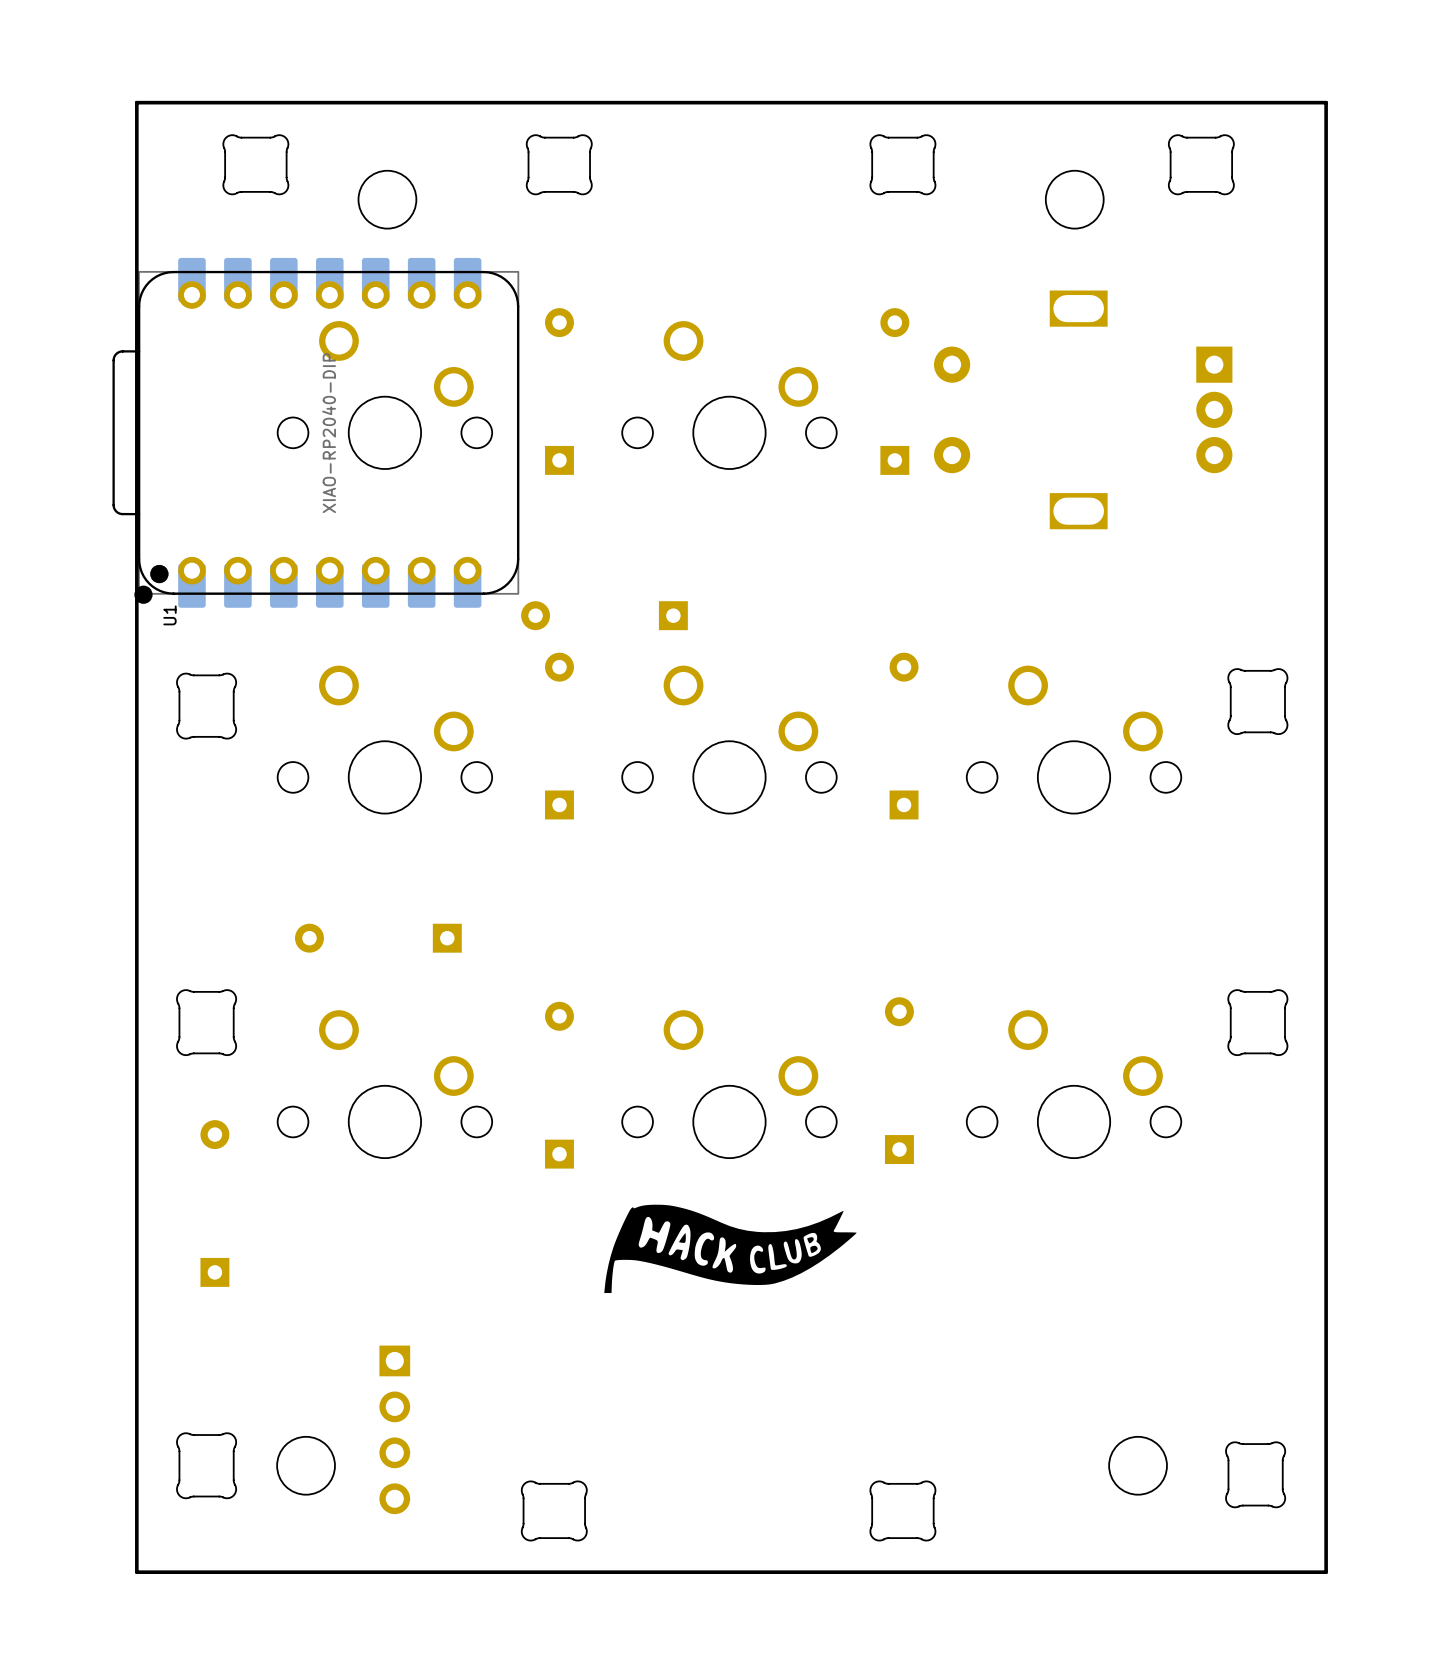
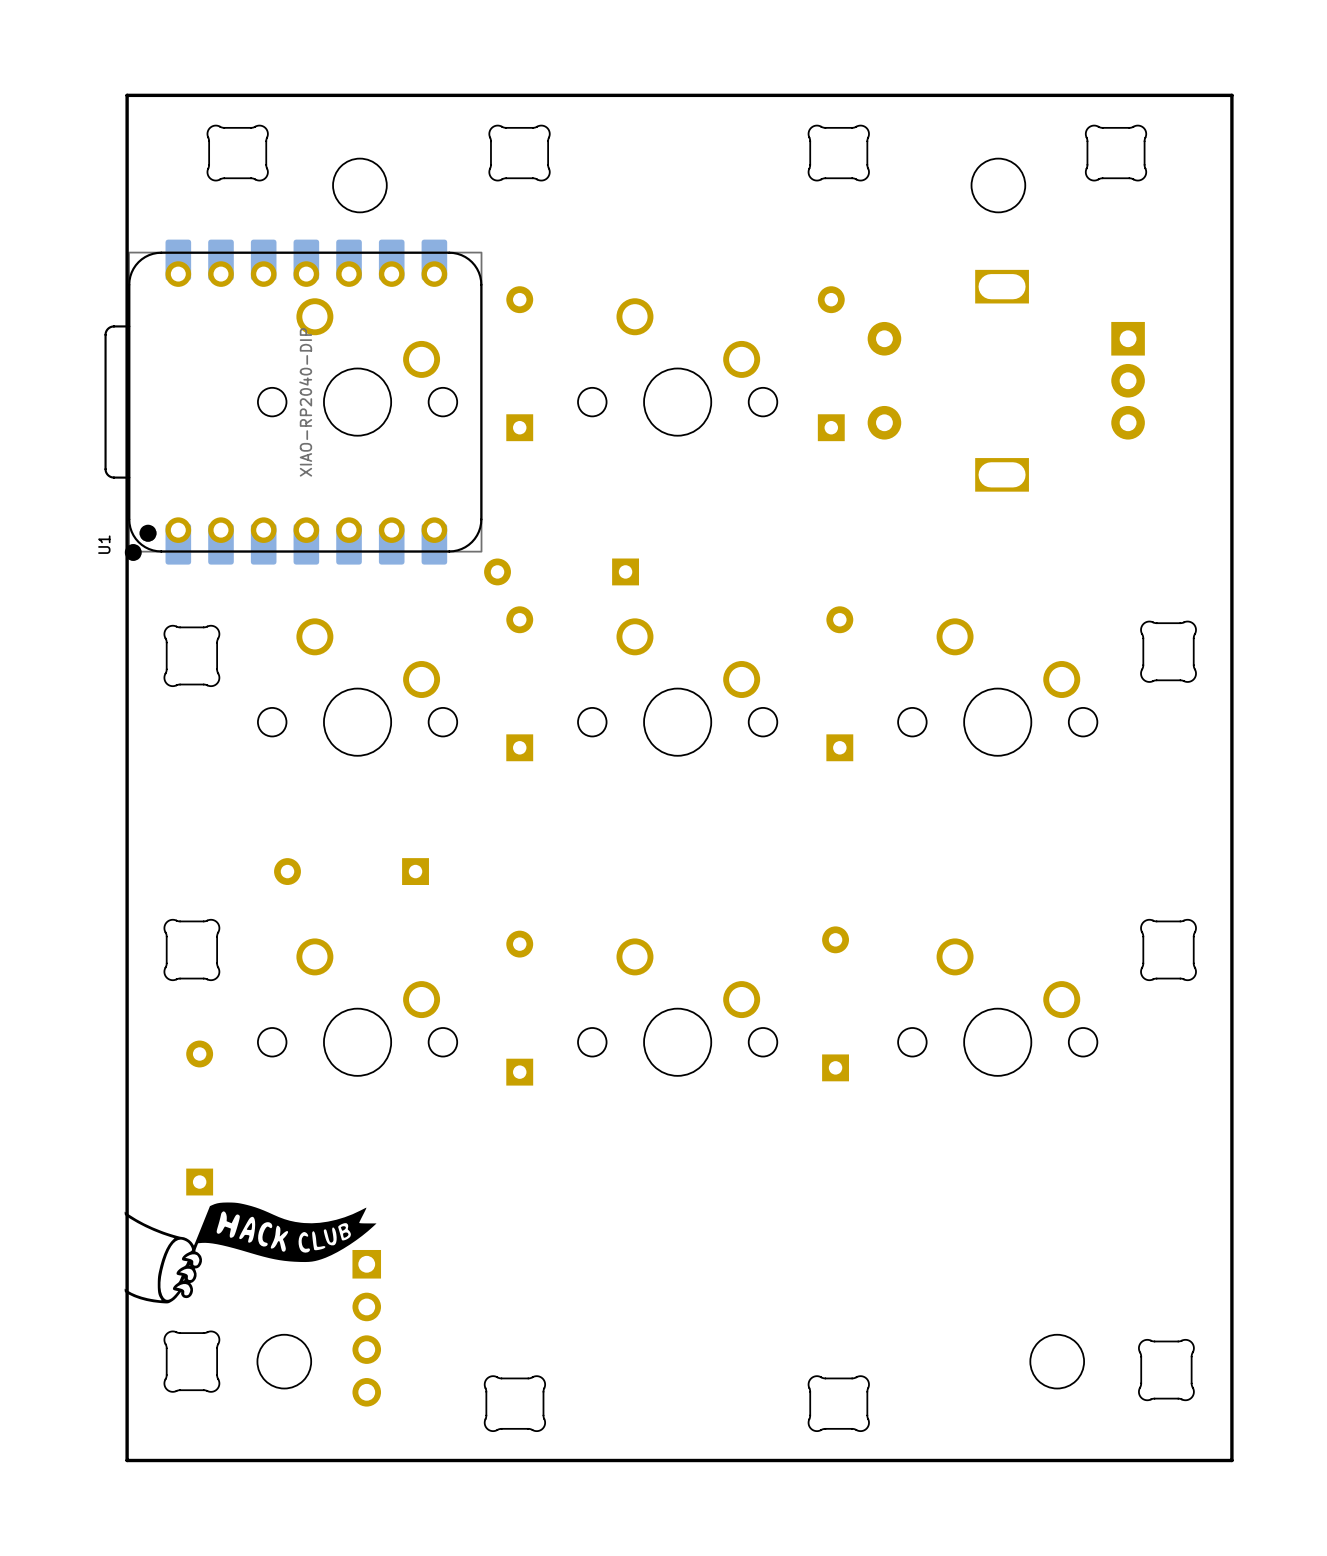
U1 name position: U1 (169, 615) -> U1 (104, 544)
drawing: [604, 1204, 857, 1294] -> none
drawing: none -> [124, 1202, 377, 1304]

